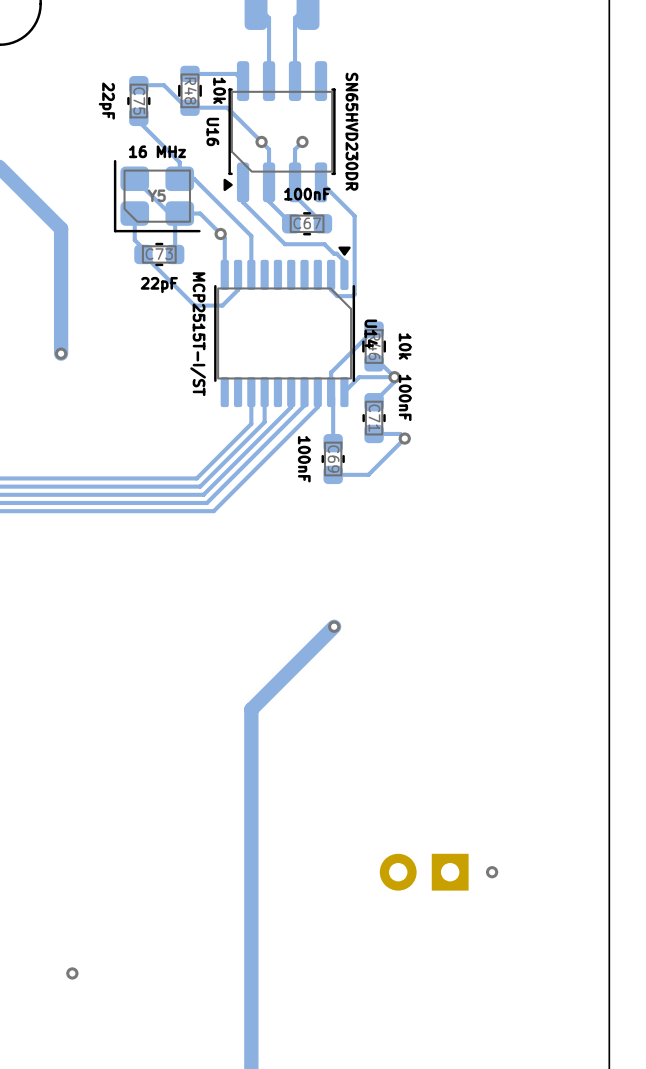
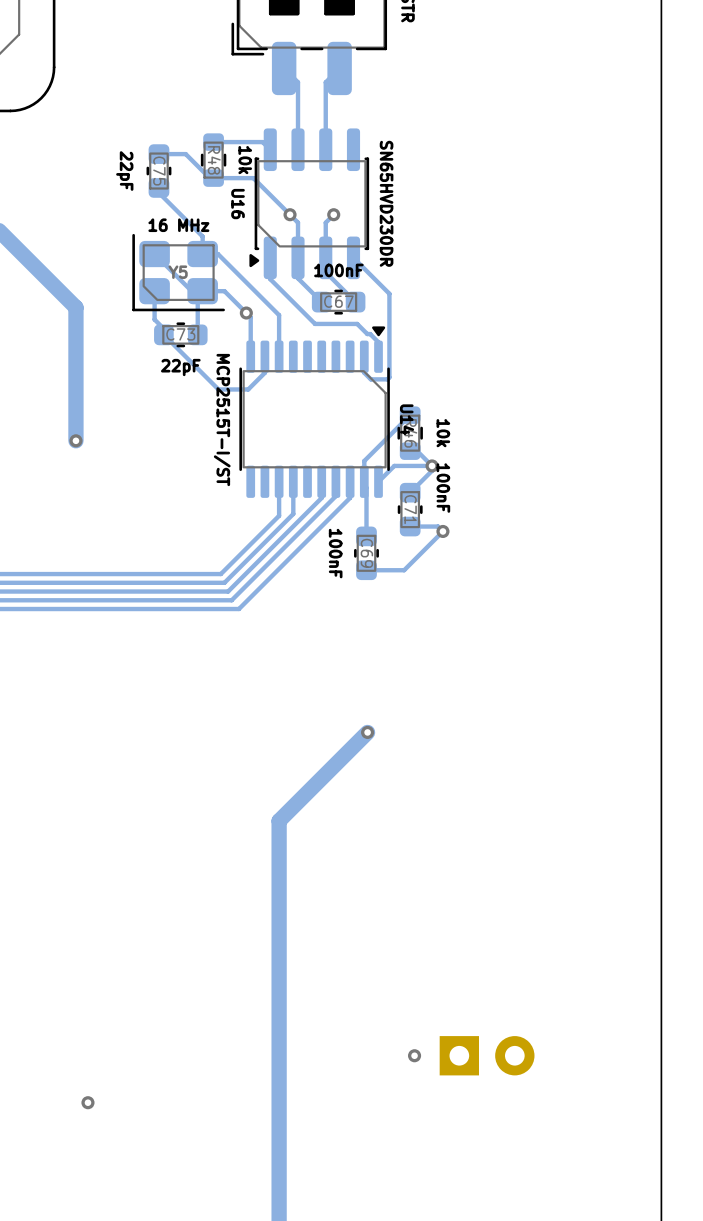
part rotation: 0° (424, 872) -> 180° (487, 1055)
part position: (424, 872) -> (487, 1055)
via: (492, 872) -> none
via: none -> (414, 1055)

